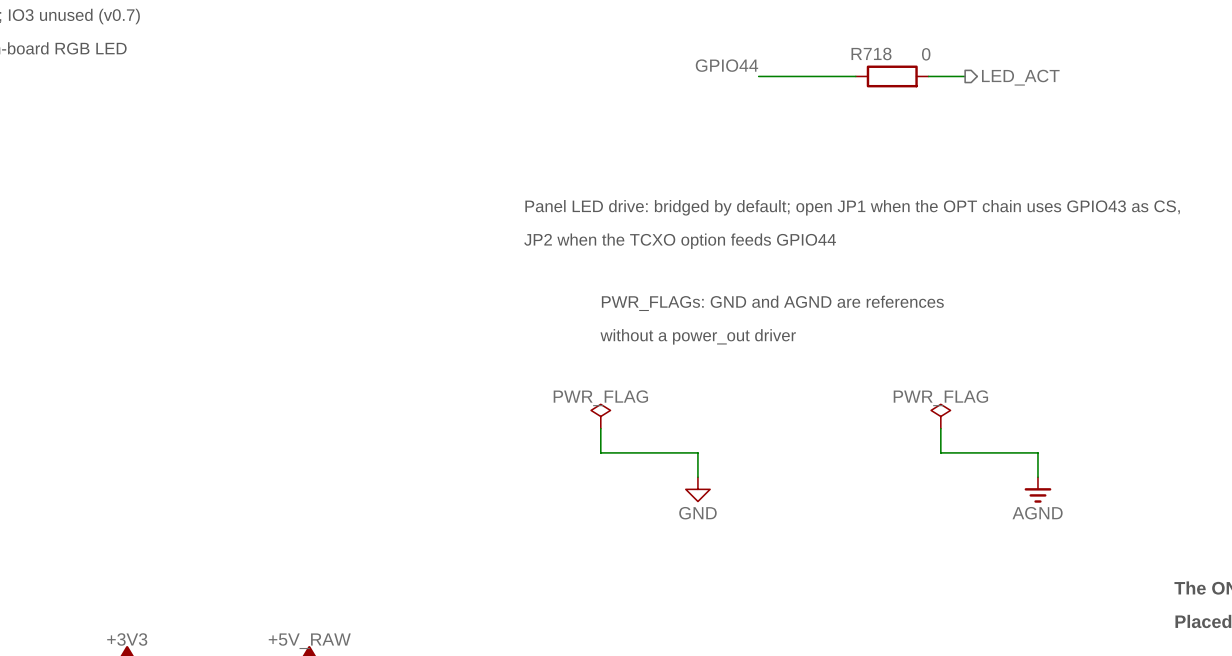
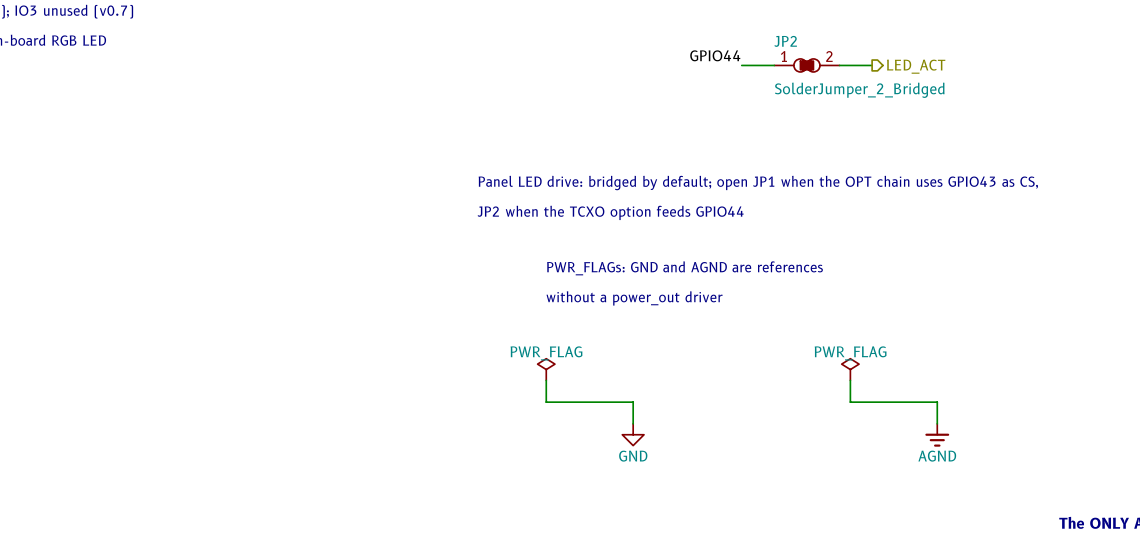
label position: GPIO44 (726, 65) -> GPIO44 (715, 55)
wire: (758, 76) (819, 76) -> none
R718: 0 (892, 76) -> none
JP2: none -> SolderJumper_2_Bridged (806, 65)

